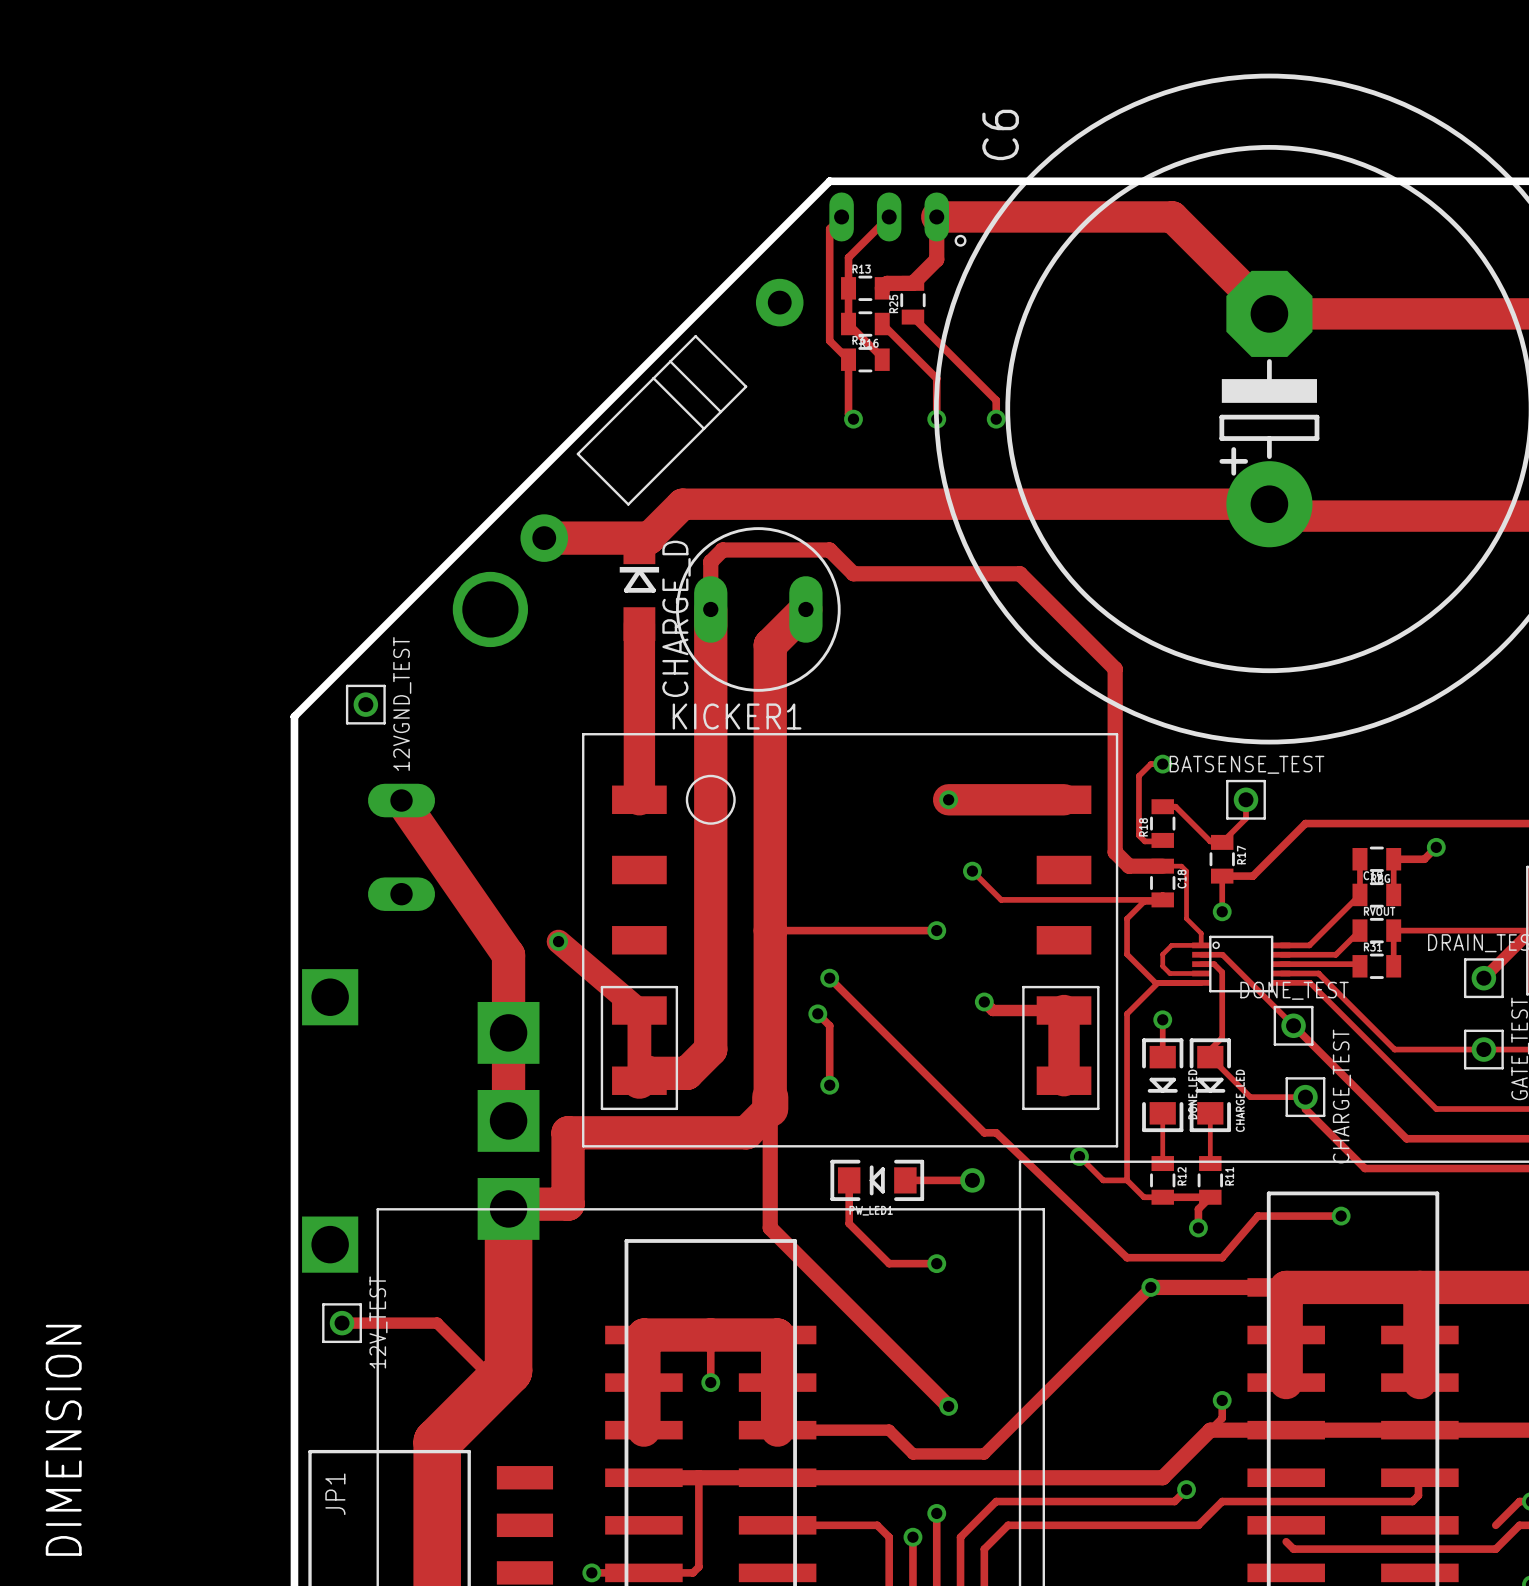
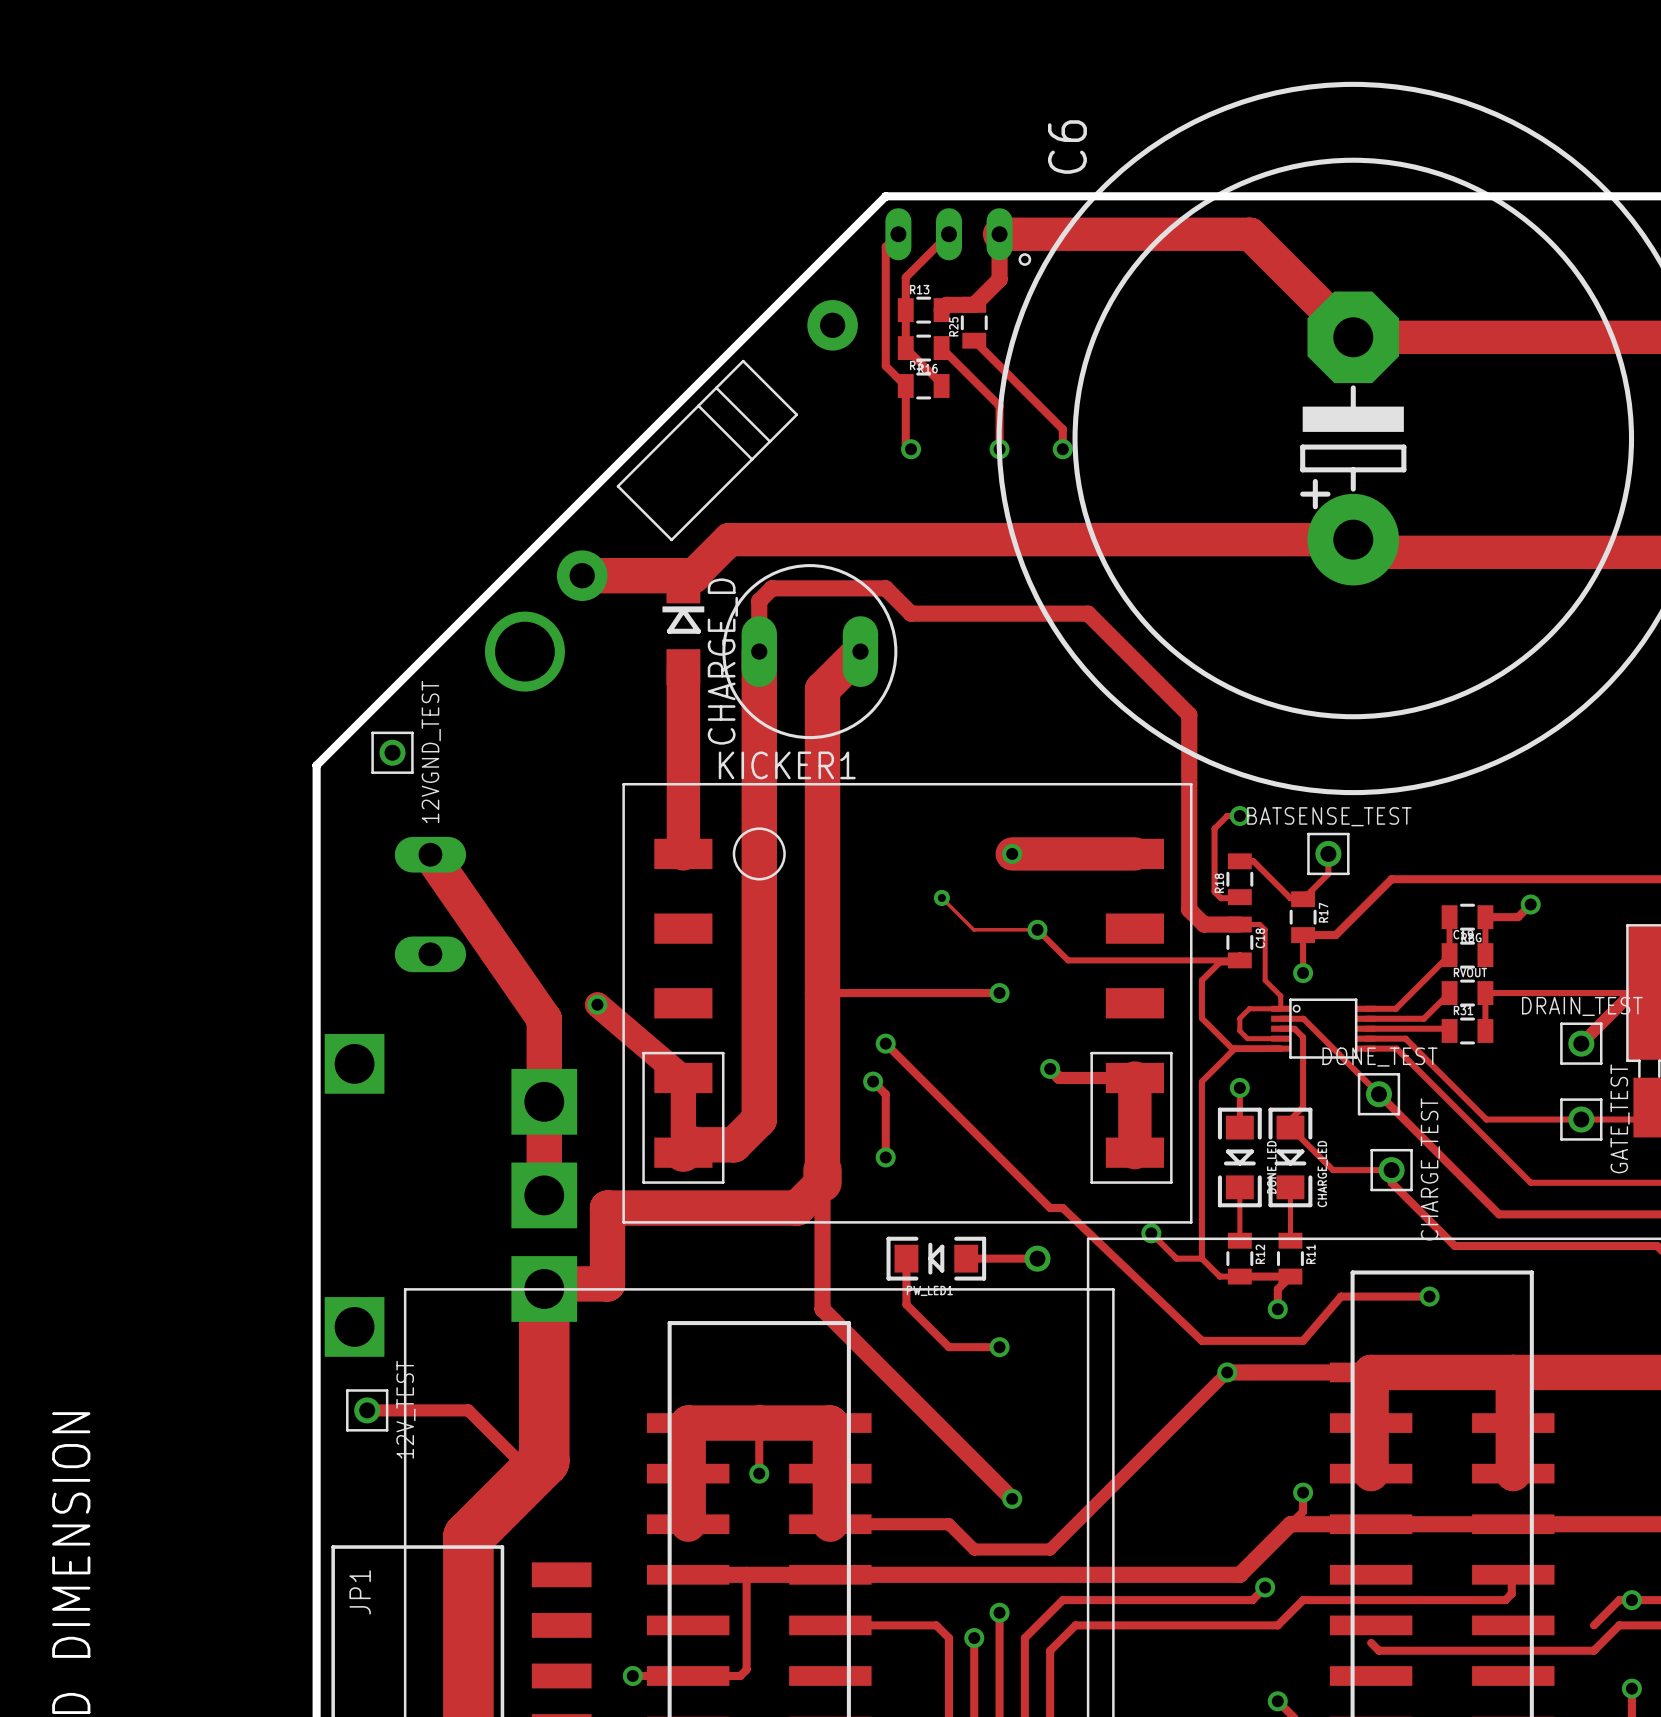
track: none -> (941, 897) (973, 929) (1037, 929)
via: none -> (941, 897)

